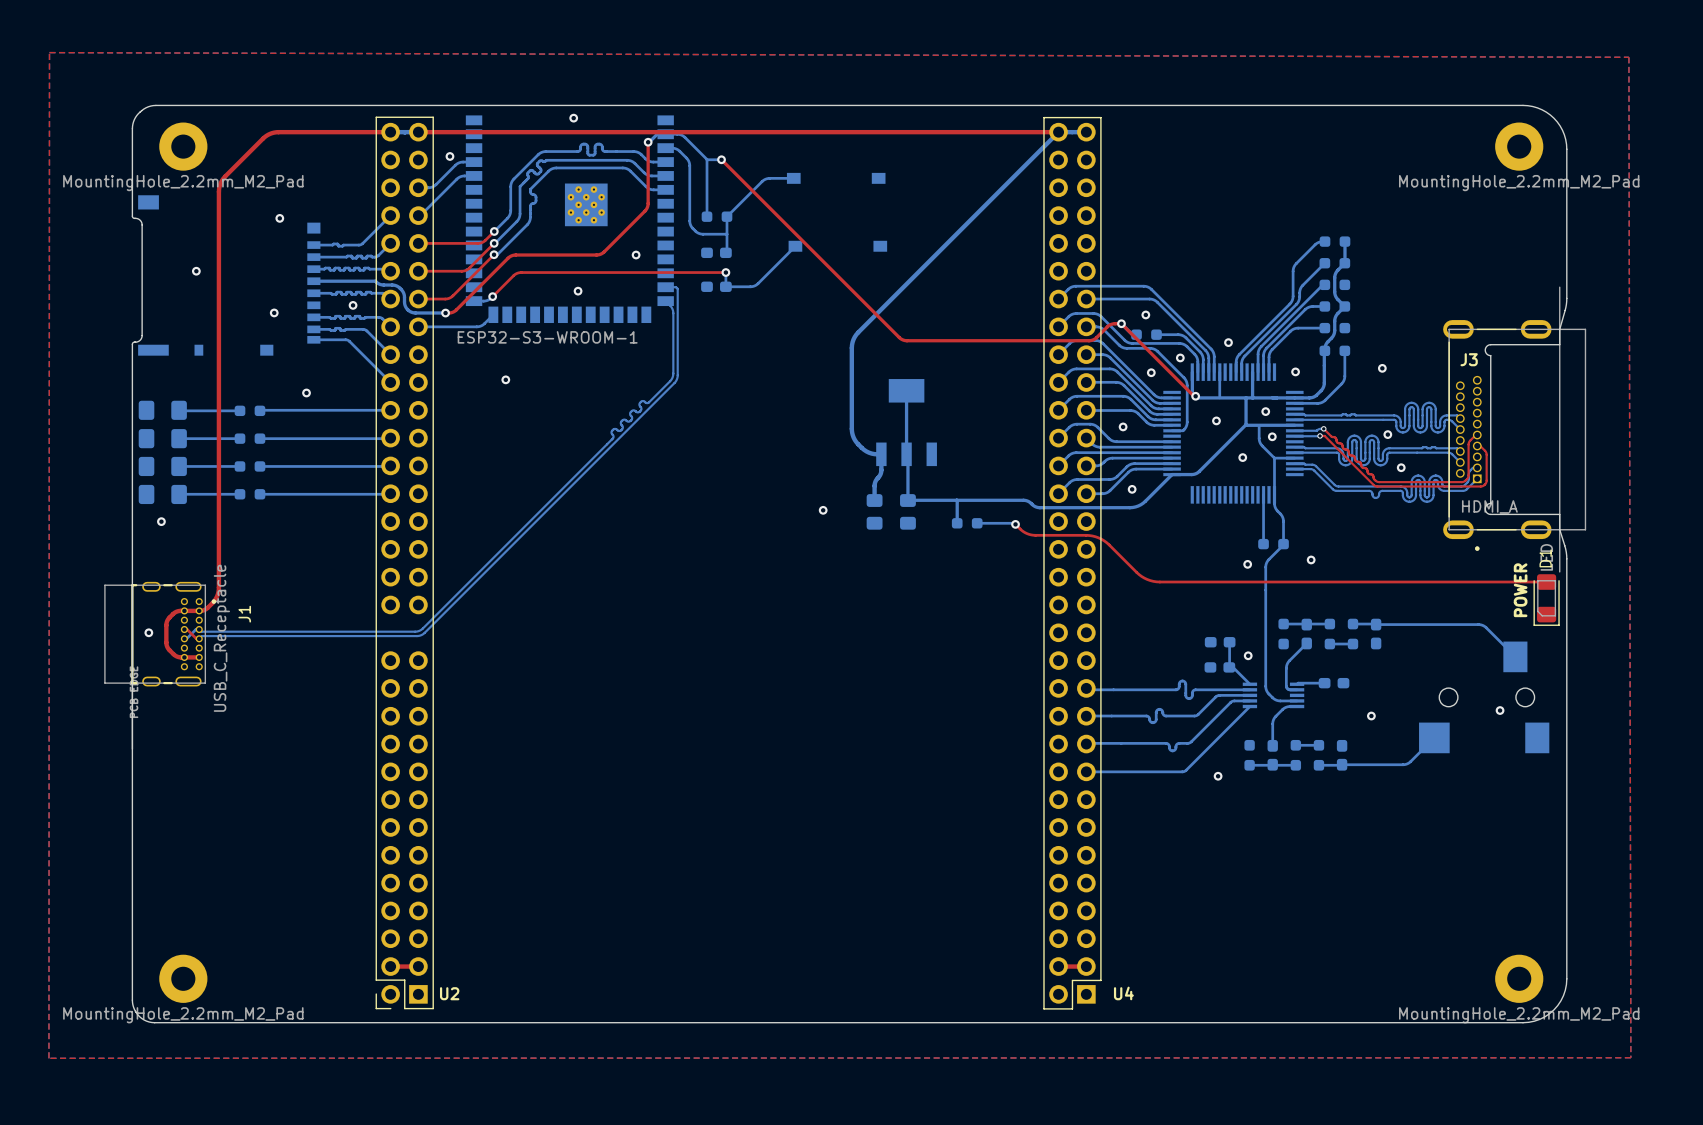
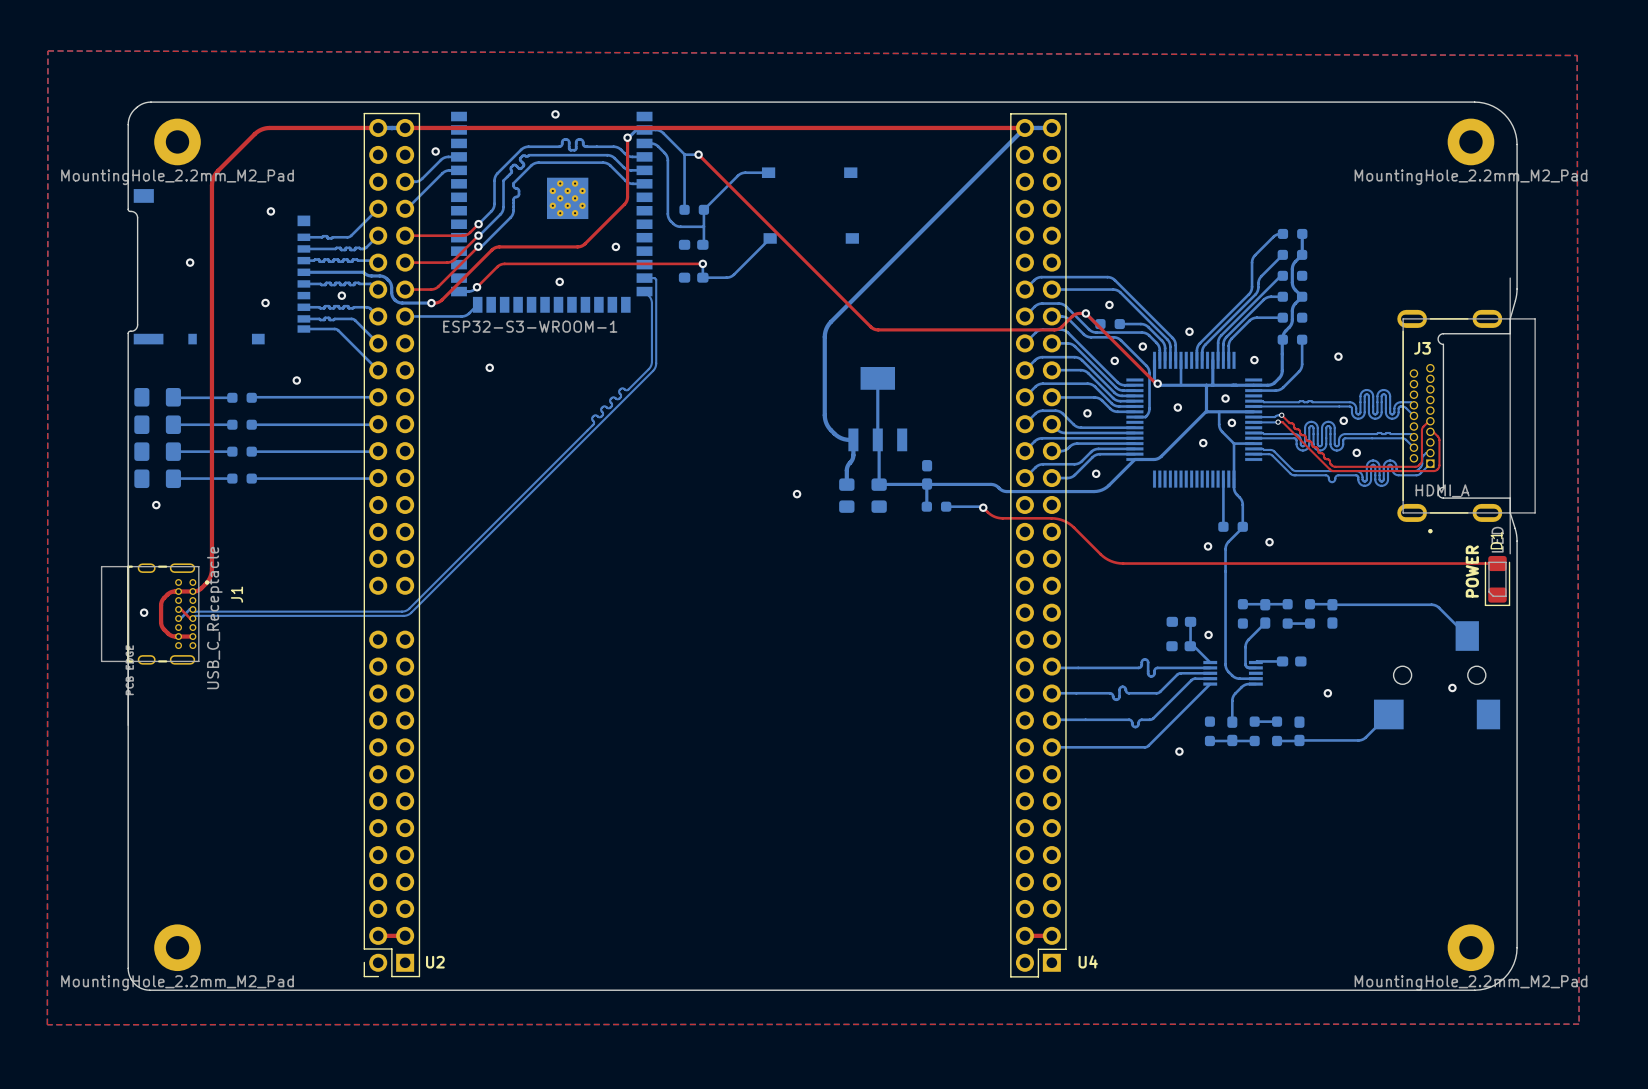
part: none -> (927, 474)

